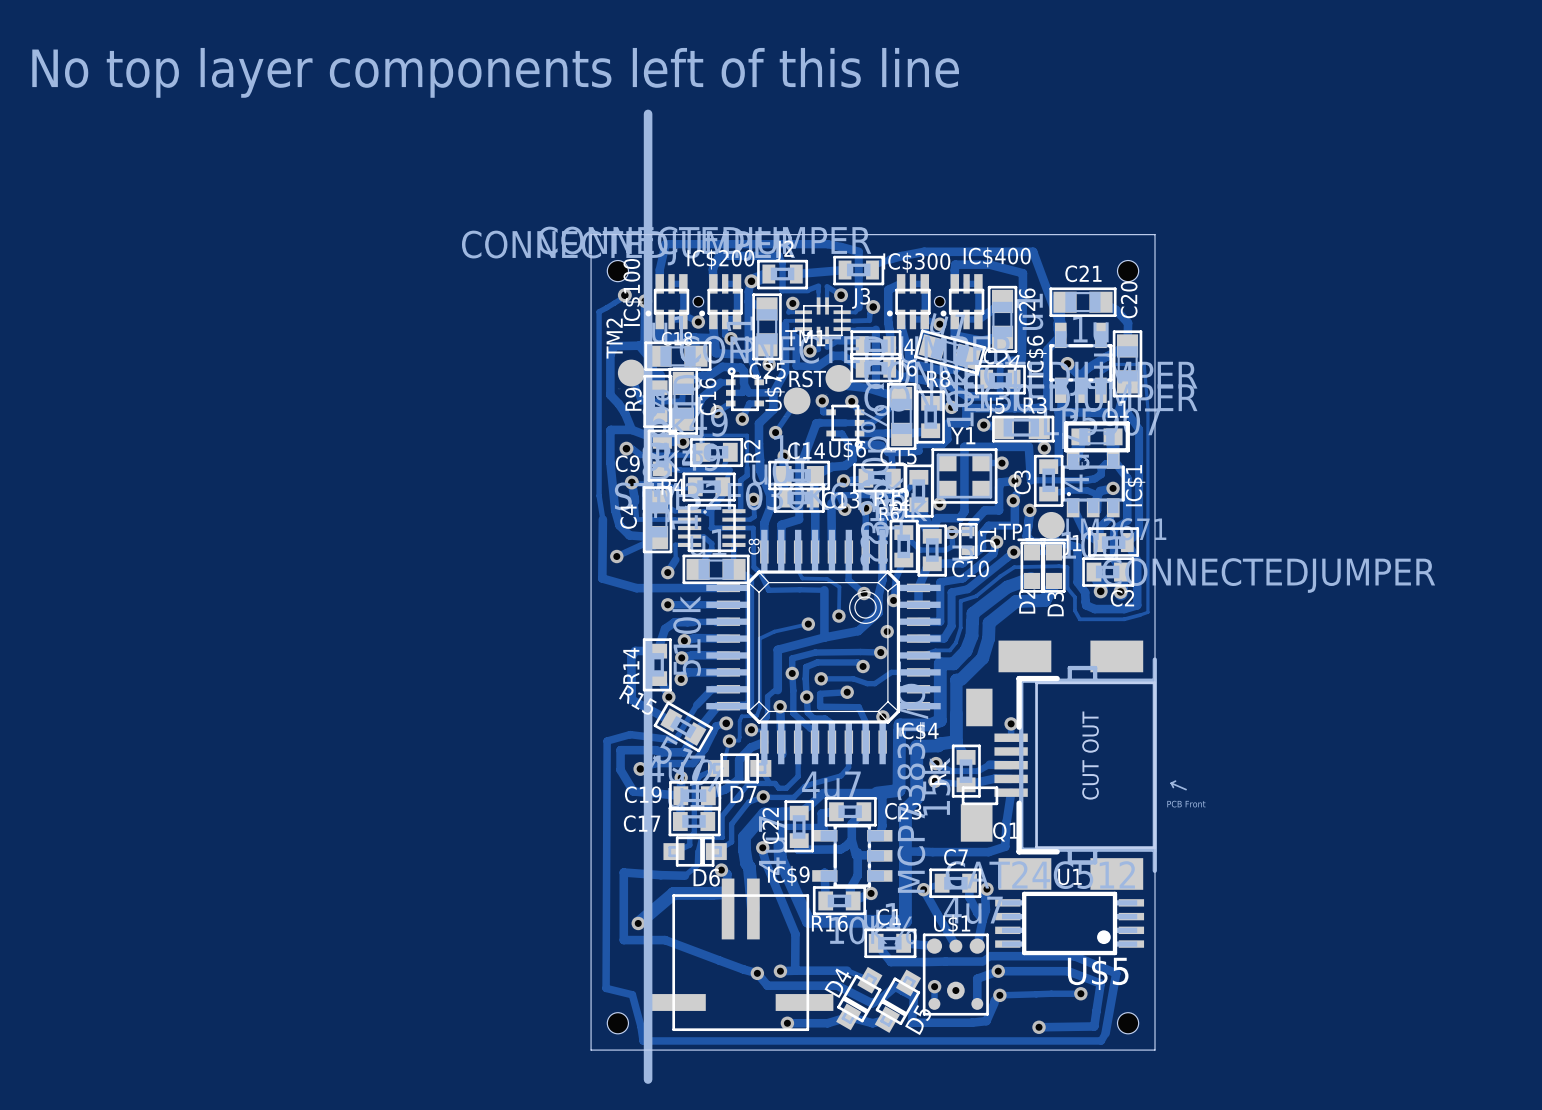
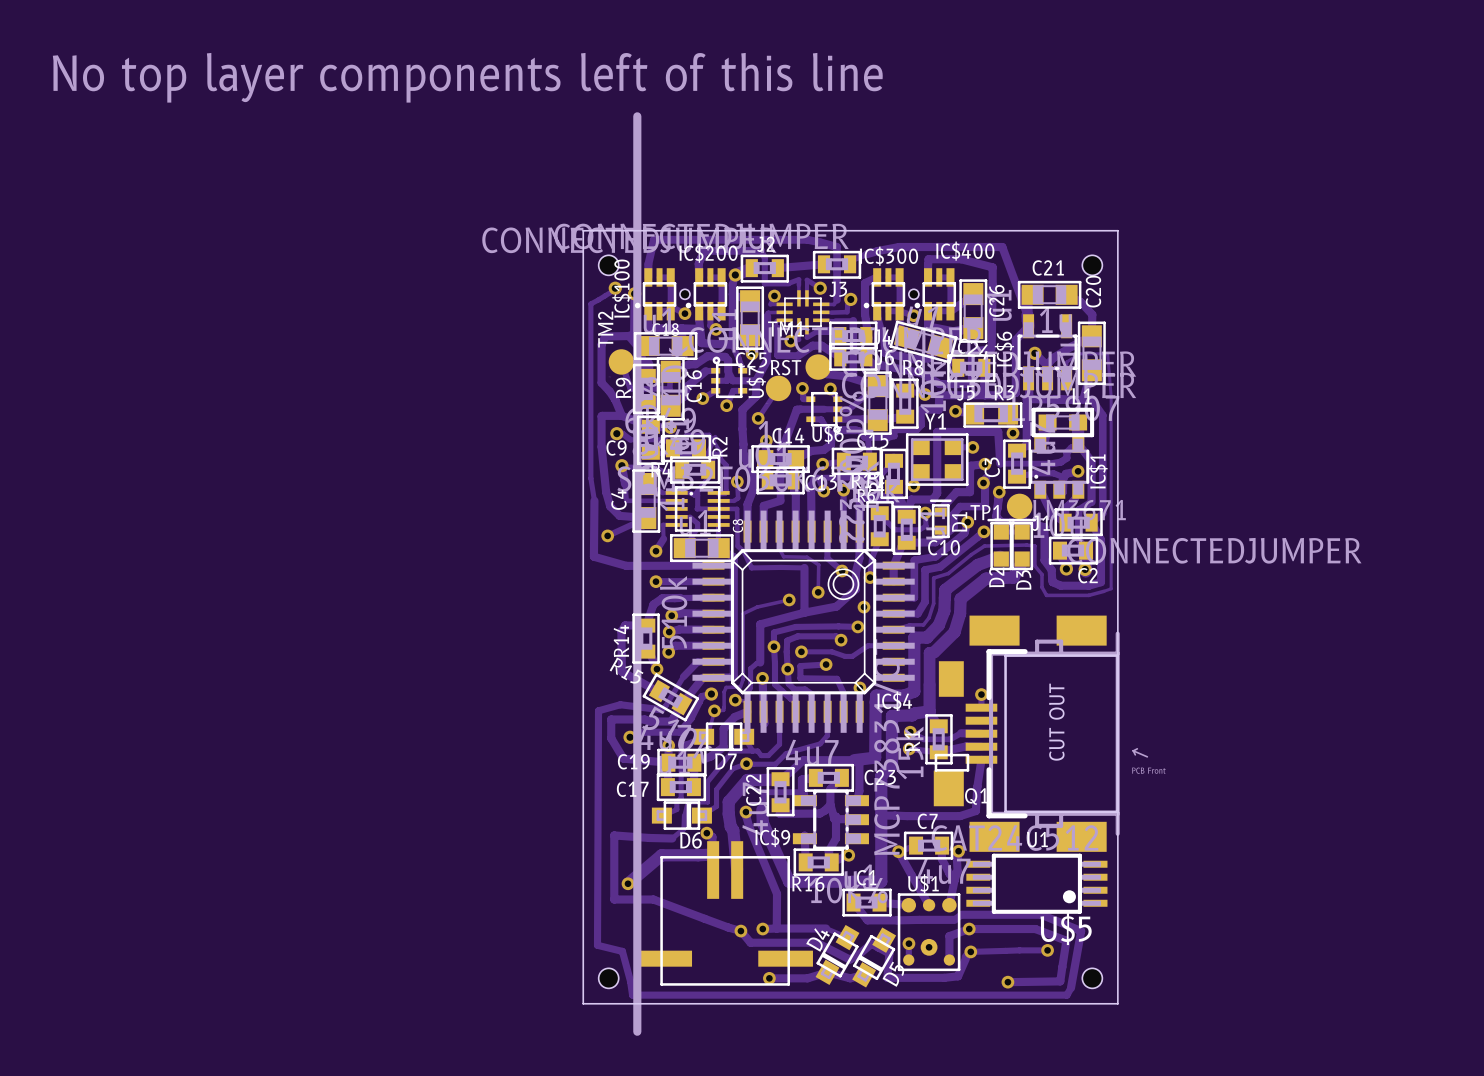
R2 position: (716, 452) -> (685, 448)
track: (677, 455) (697, 455) (702, 452) (702, 435) (747, 435) (747, 475) (740, 480) (740, 510) (733, 511) -> (665, 439) (672, 448) (686, 434) (709, 434) (720, 451) (720, 458) (726, 465) (726, 490) (725, 493) (718, 494)

